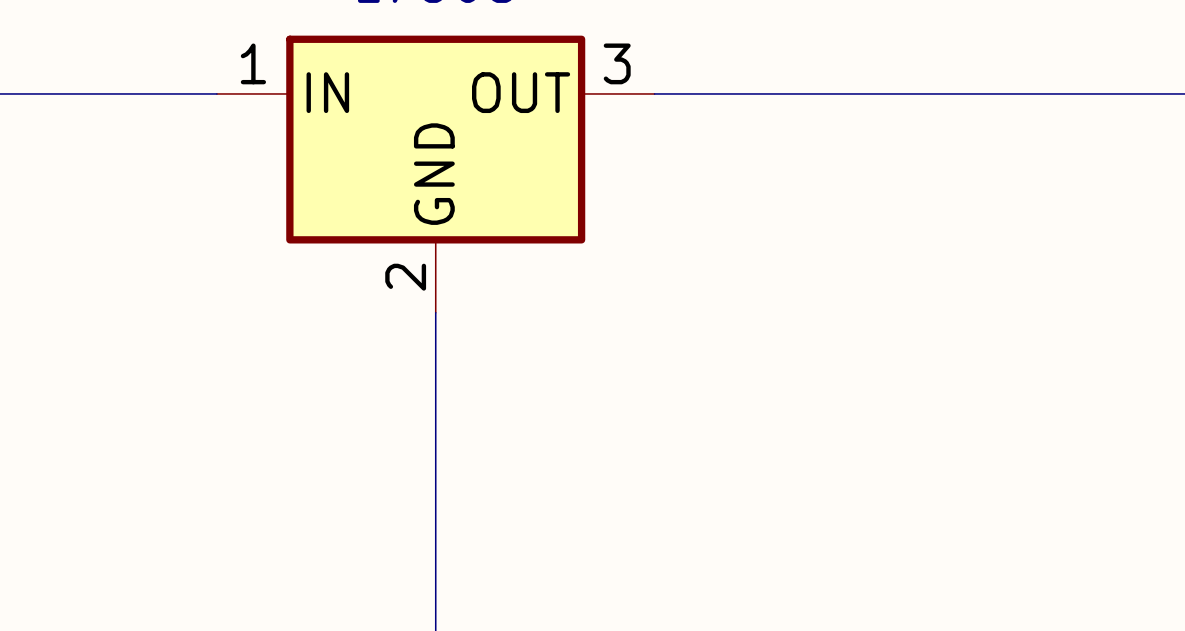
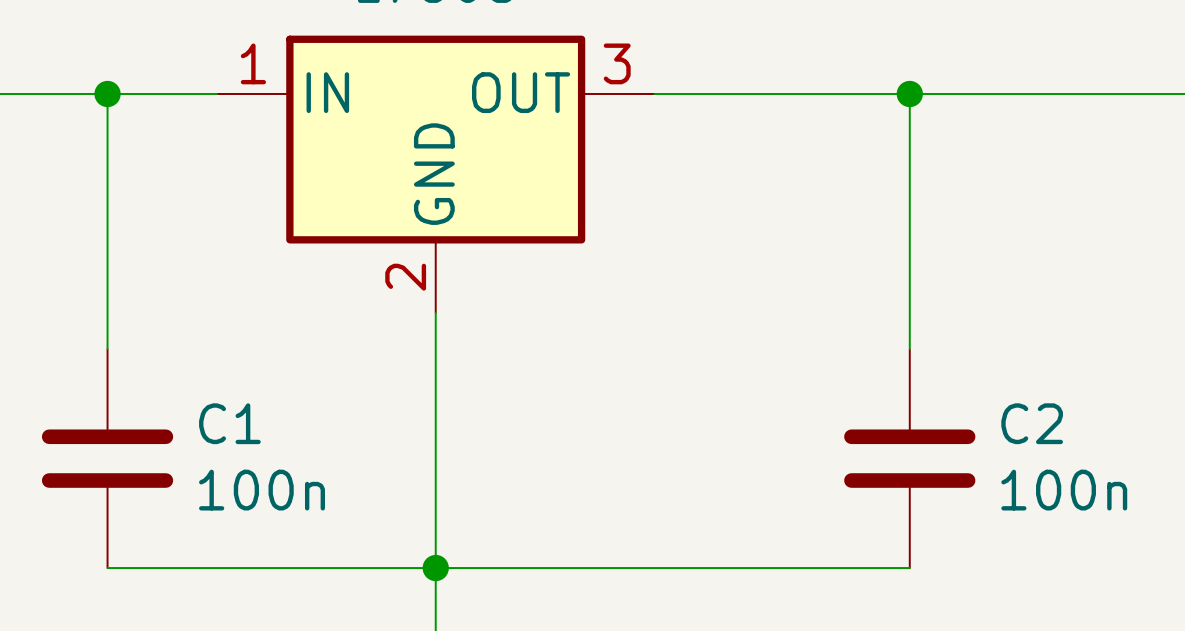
wire: none -> (107, 93) (107, 349)
junction: none -> (107, 93)
wire: none -> (909, 93) (909, 349)
junction: none -> (909, 93)
C1: none -> 100n (107, 458)
C2: none -> 100n (909, 458)
wire: none -> (107, 568) (909, 568)
junction: none -> (435, 568)

